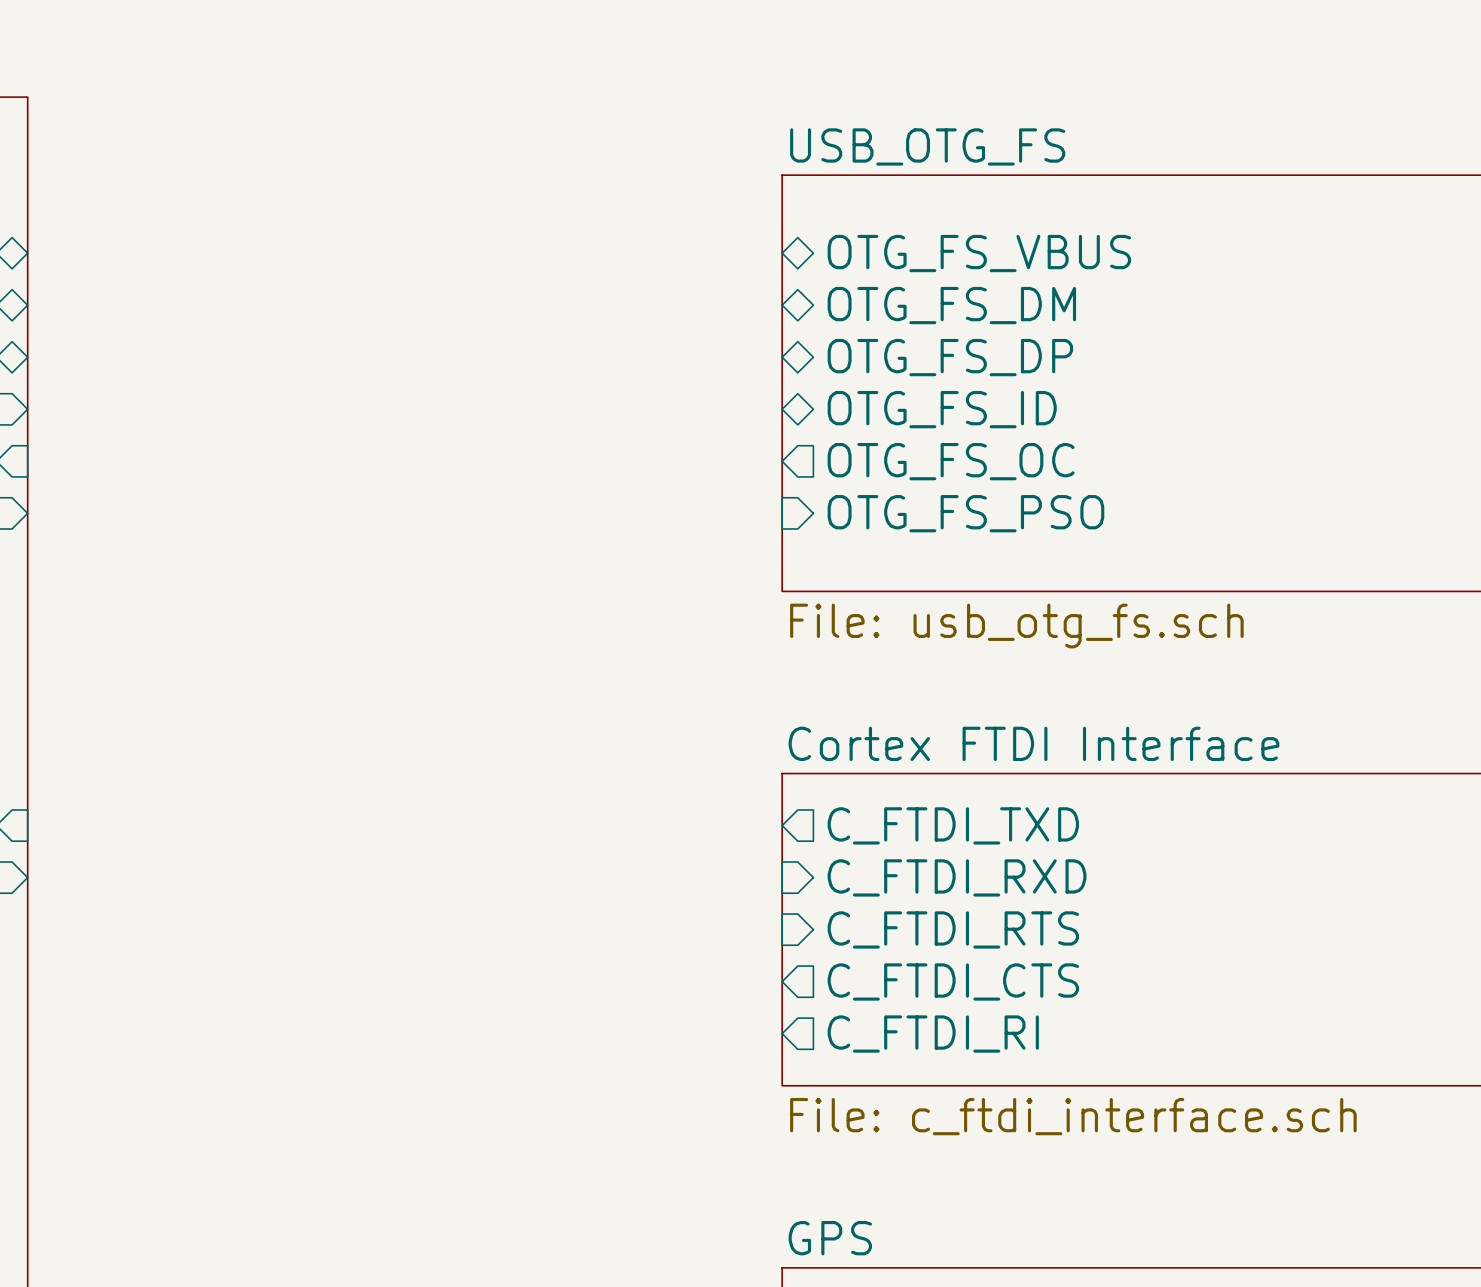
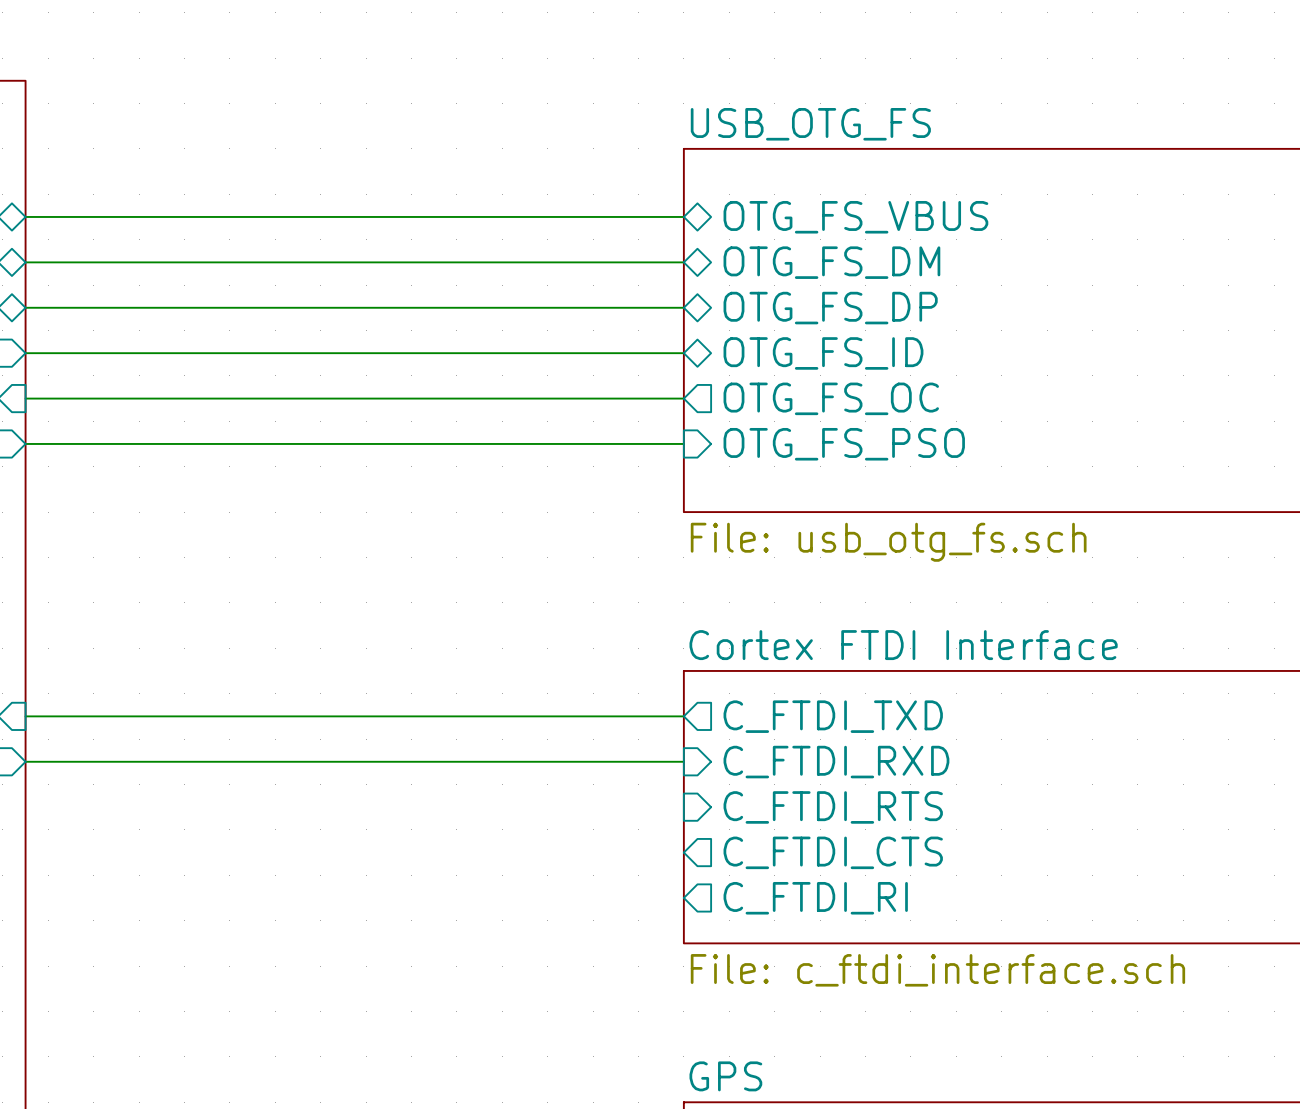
wire: none -> (25, 216) (683, 216)
wire: none -> (25, 262) (683, 262)
wire: none -> (25, 307) (683, 307)
wire: none -> (25, 353) (683, 353)
wire: none -> (25, 398) (683, 398)
wire: none -> (25, 443) (683, 443)
wire: none -> (25, 716) (683, 716)
wire: none -> (25, 761) (683, 761)

